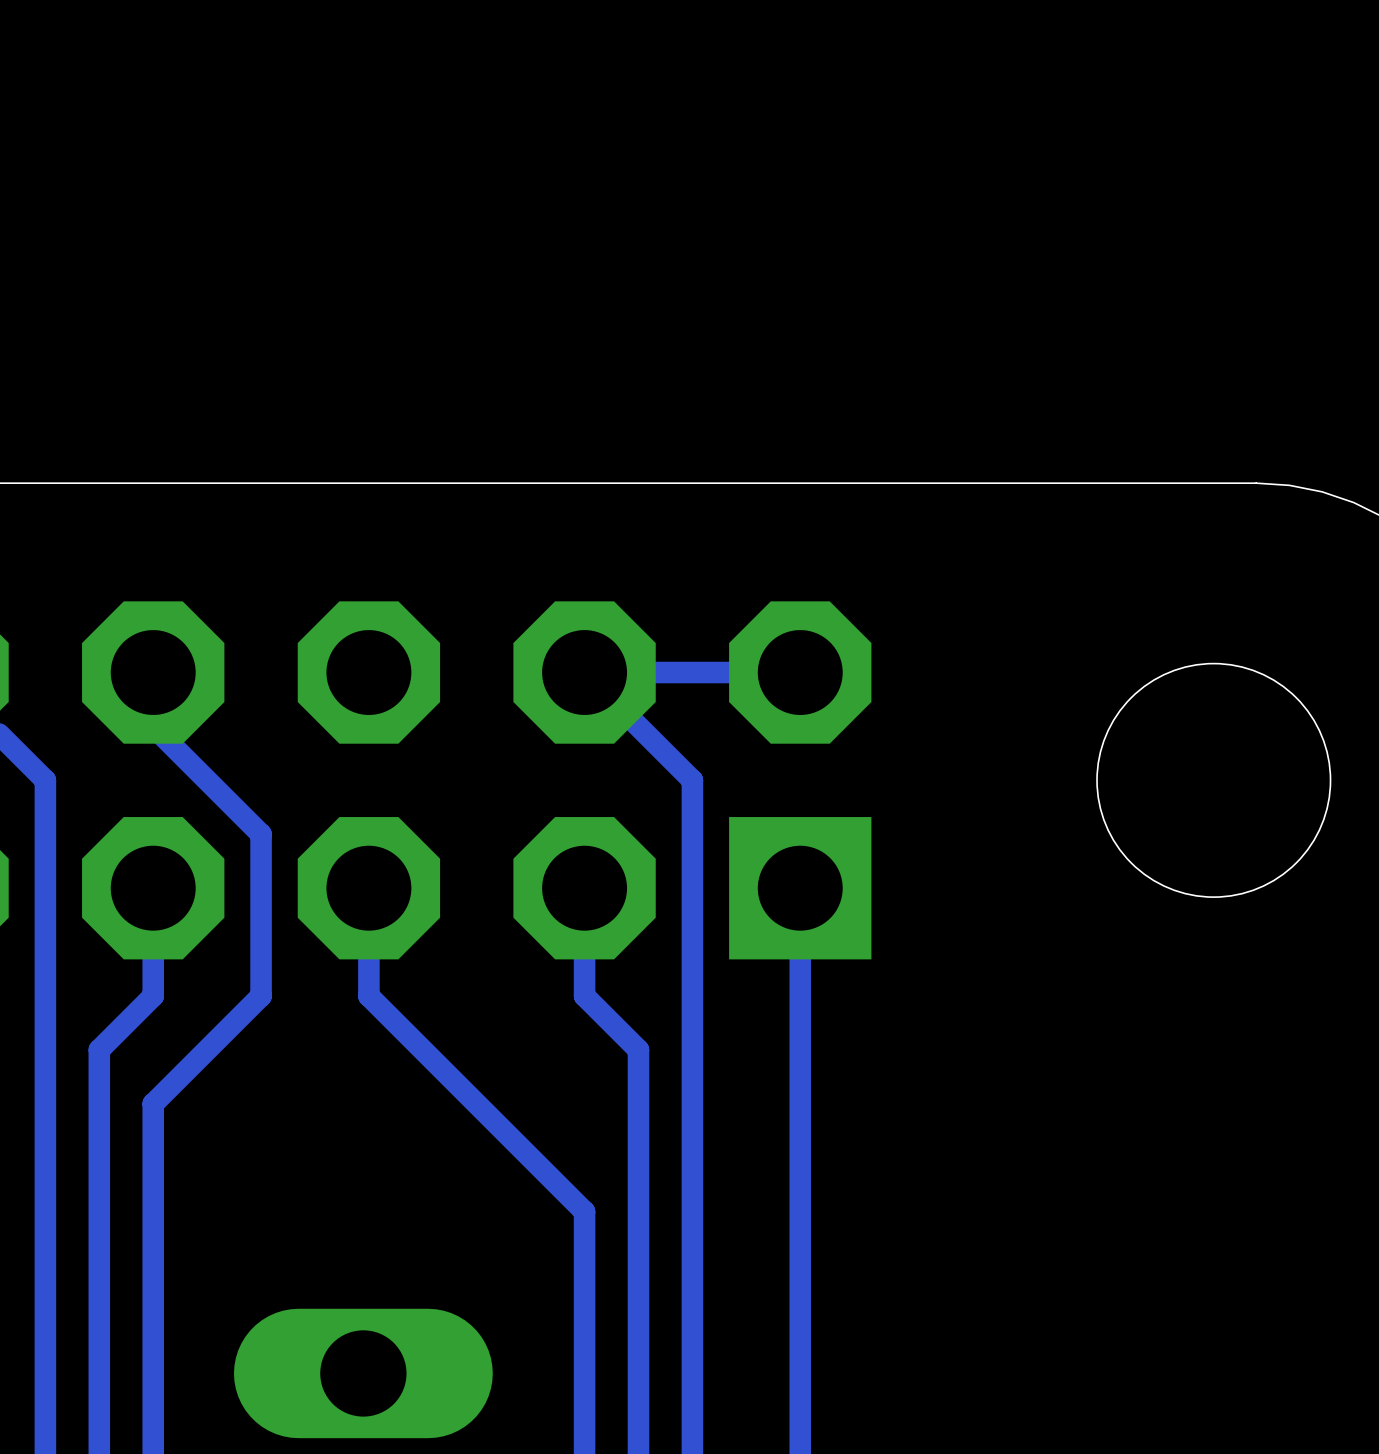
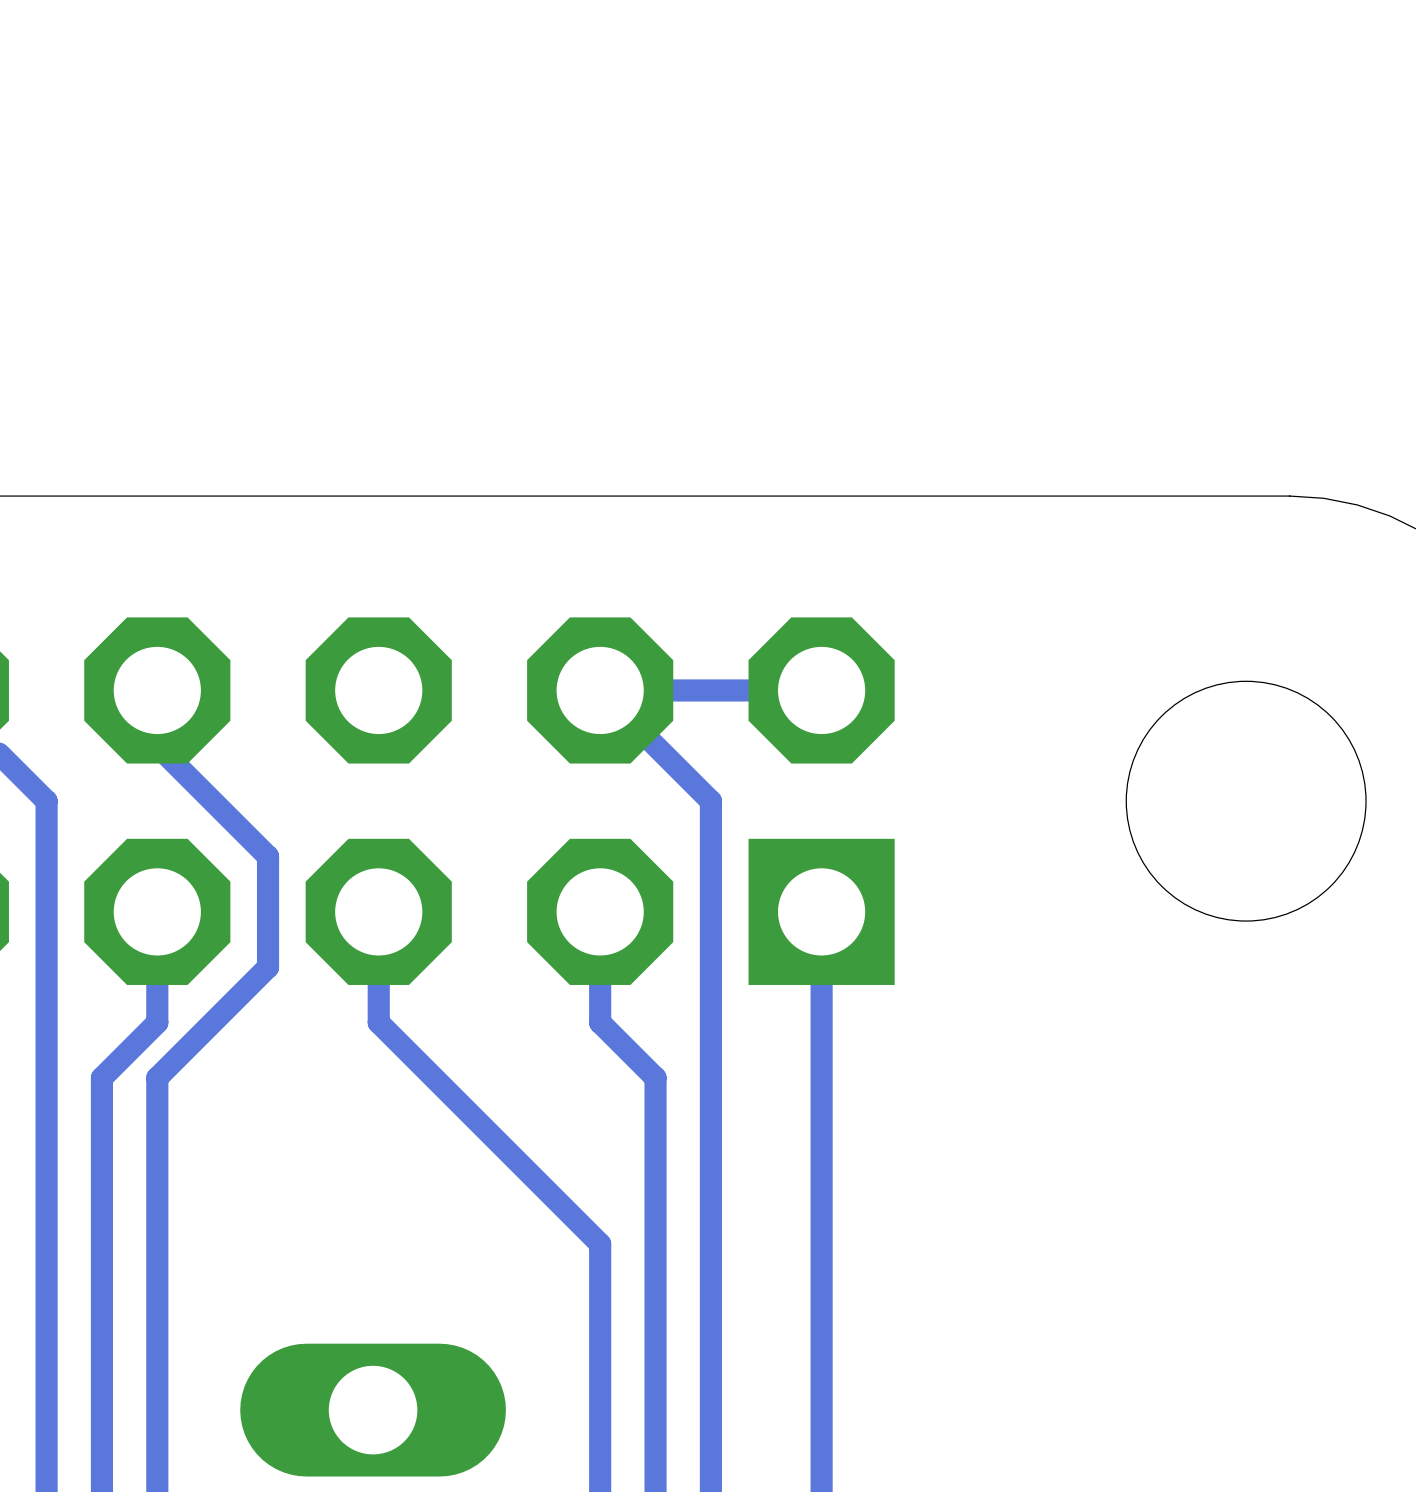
track: (261, 942) (261, 996) (153, 1103) -> (268, 967) (157, 1077) (157, 1133)

